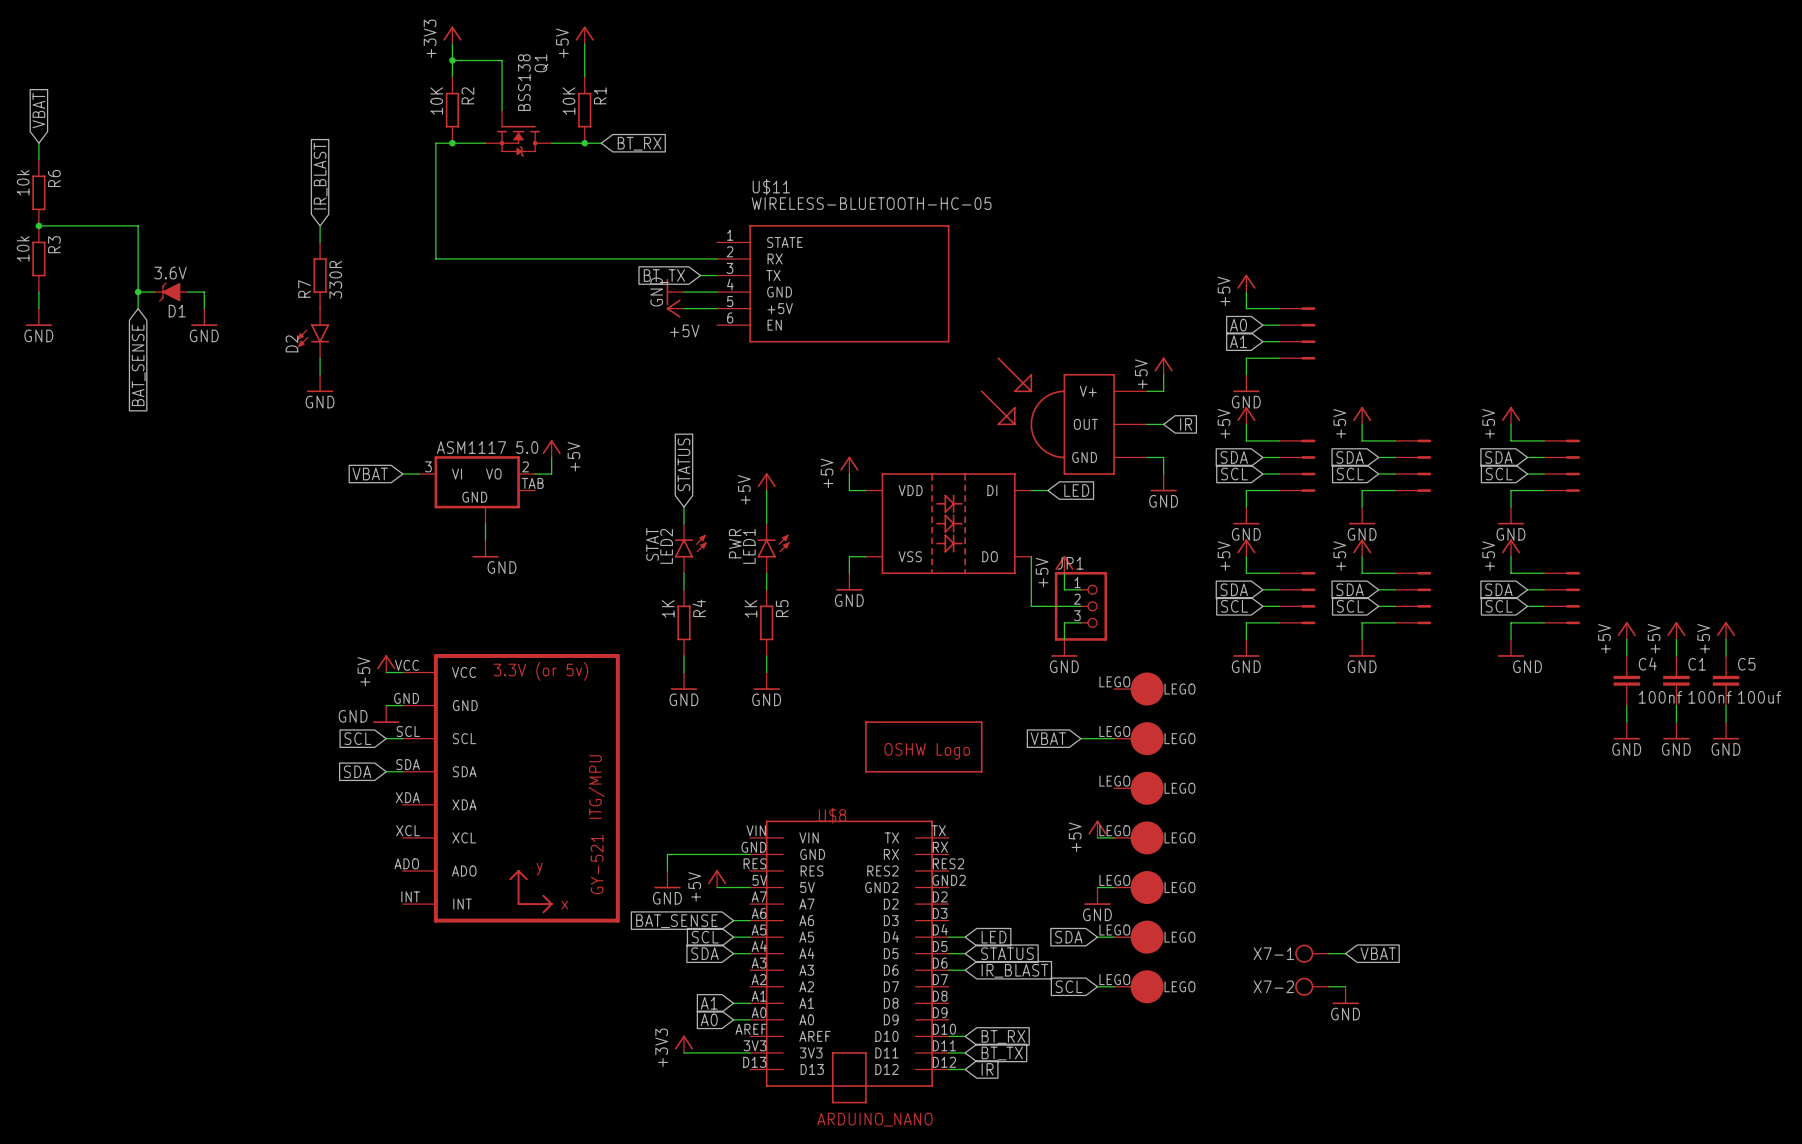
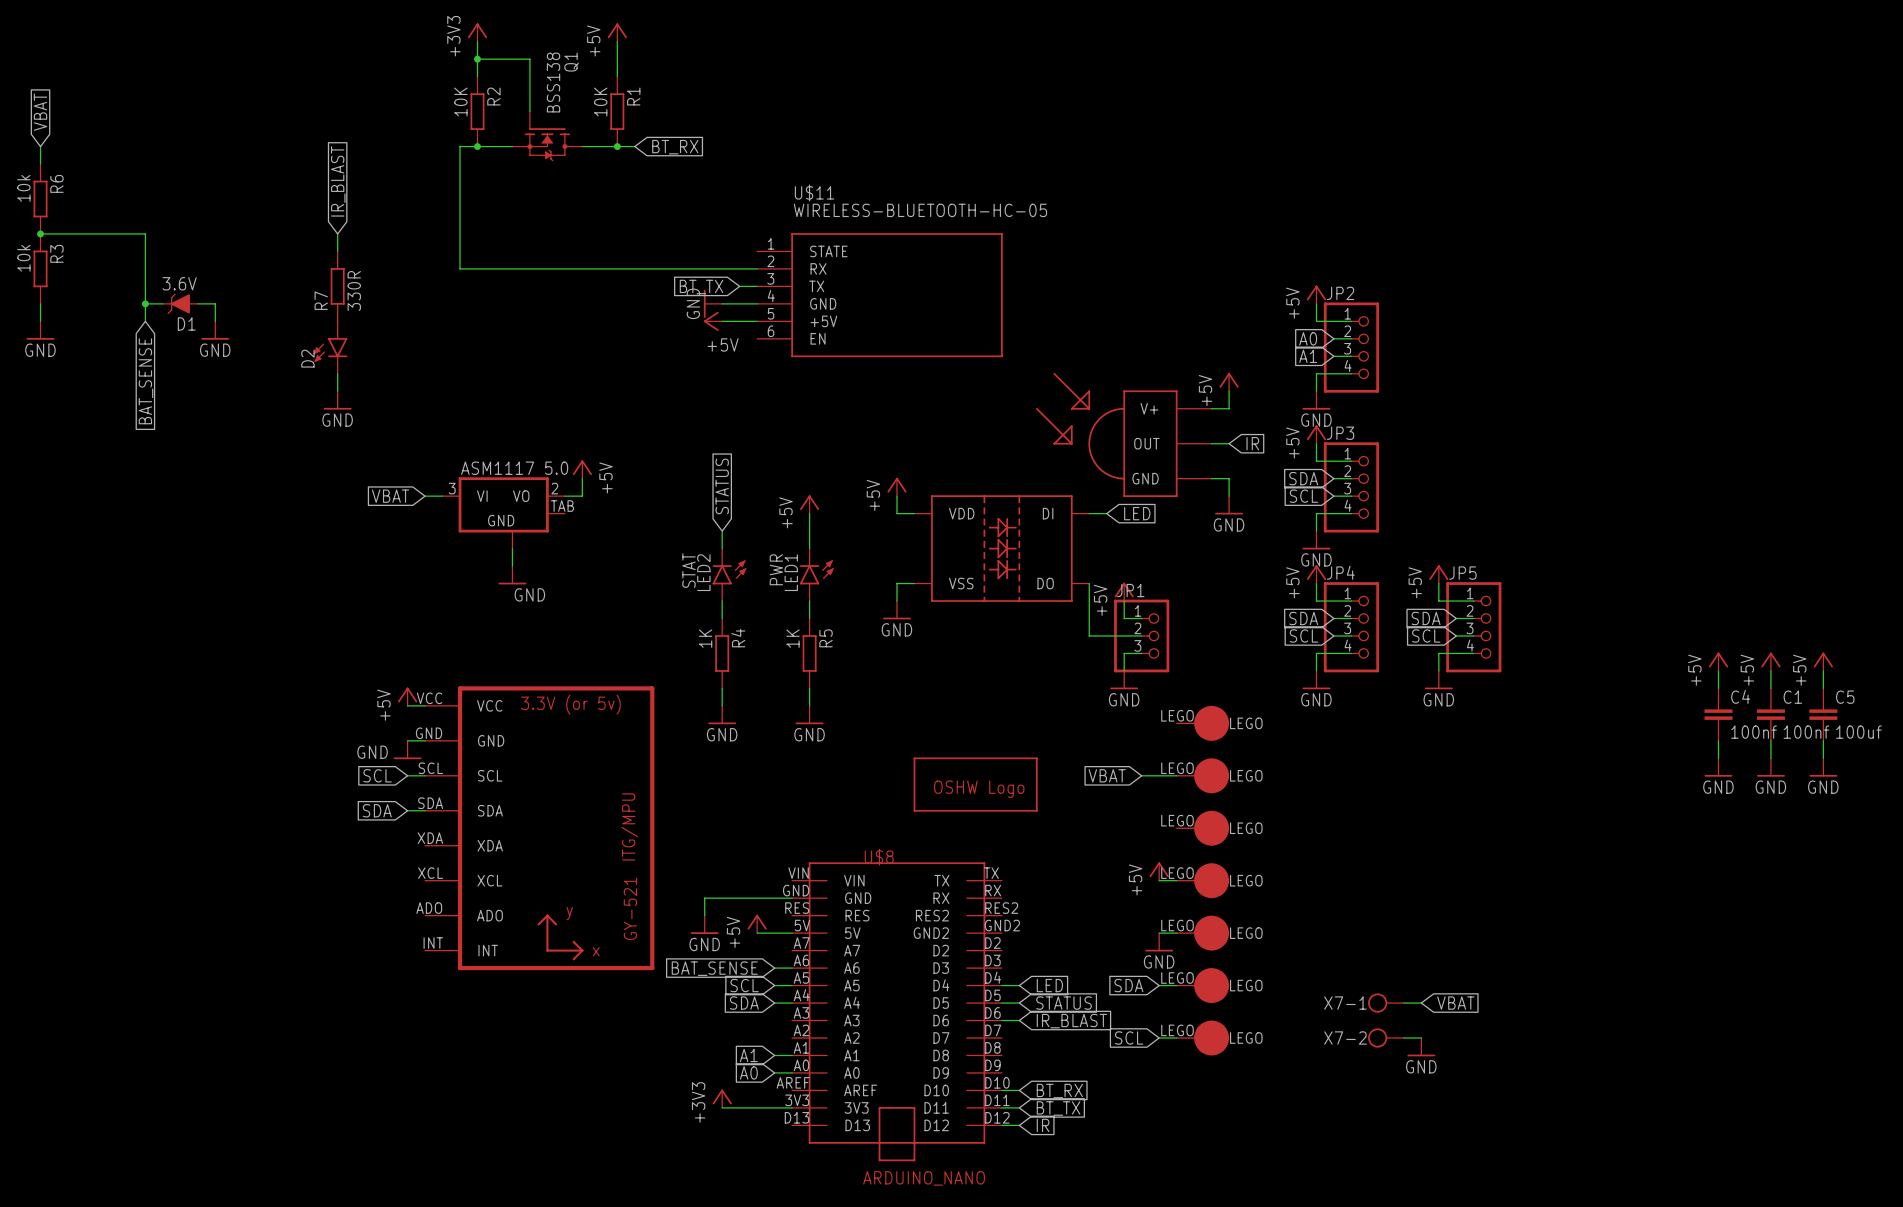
part: (1297, 308) -> none
part: (1297, 325) -> none
JP2: none -> (1351, 347)
part: (1297, 341) -> none
part: (1297, 358) -> none
power symbol: +5V (1362, 415) -> none
power symbol: +5V (1511, 415) -> none
wire: (1362, 424) (1362, 440) (1395, 440) -> none
wire: (1511, 424) (1511, 440) (1544, 440) -> none
part: (1297, 440) -> none
part: (1413, 440) -> none
part: (1562, 440) -> none
part: (1297, 457) -> none
global label: SDA (1350, 457) -> none
wire: (1378, 457) (1395, 457) -> none
part: (1413, 457) -> none
global label: SDA (1498, 457) -> none
wire: (1527, 457) (1544, 457) -> none
part: (1562, 457) -> none
JP3: none -> (1351, 487)
part: (1297, 474) -> none
global label: SCL (1350, 474) -> none
wire: (1378, 474) (1395, 474) -> none
part: (1413, 474) -> none
global label: SCL (1499, 474) -> none
wire: (1527, 474) (1544, 474) -> none
part: (1562, 474) -> none
part: (1297, 490) -> none
wire: (1395, 490) (1362, 490) (1362, 507) -> none
part: (1413, 490) -> none
wire: (1544, 490) (1511, 490) (1511, 507) -> none
part: (1562, 490) -> none
power symbol: GND (1362, 515) -> none
power symbol: GND (1511, 515) -> none
power symbol: +5V (1511, 548) -> none
wire: (1511, 556) (1511, 573) (1544, 573) -> none
part: (1297, 573) -> none
part: (1413, 573) -> none
part: (1562, 573) -> none
part: (1297, 589) -> none
part: (1413, 589) -> none
global label: SDA (1498, 589) -> none
wire: (1527, 589) (1544, 589) -> none
part: (1562, 589) -> none
JP4: none -> (1351, 627)
JP5: none -> (1473, 627)
part: (1297, 606) -> none
part: (1413, 606) -> none
global label: SCL (1499, 606) -> none
wire: (1527, 606) (1544, 606) -> none
part: (1562, 606) -> none
part: (1297, 622) -> none
part: (1413, 622) -> none
wire: (1544, 622) (1511, 622) (1511, 639) -> none
part: (1562, 622) -> none
power symbol: GND (1511, 648) -> none

